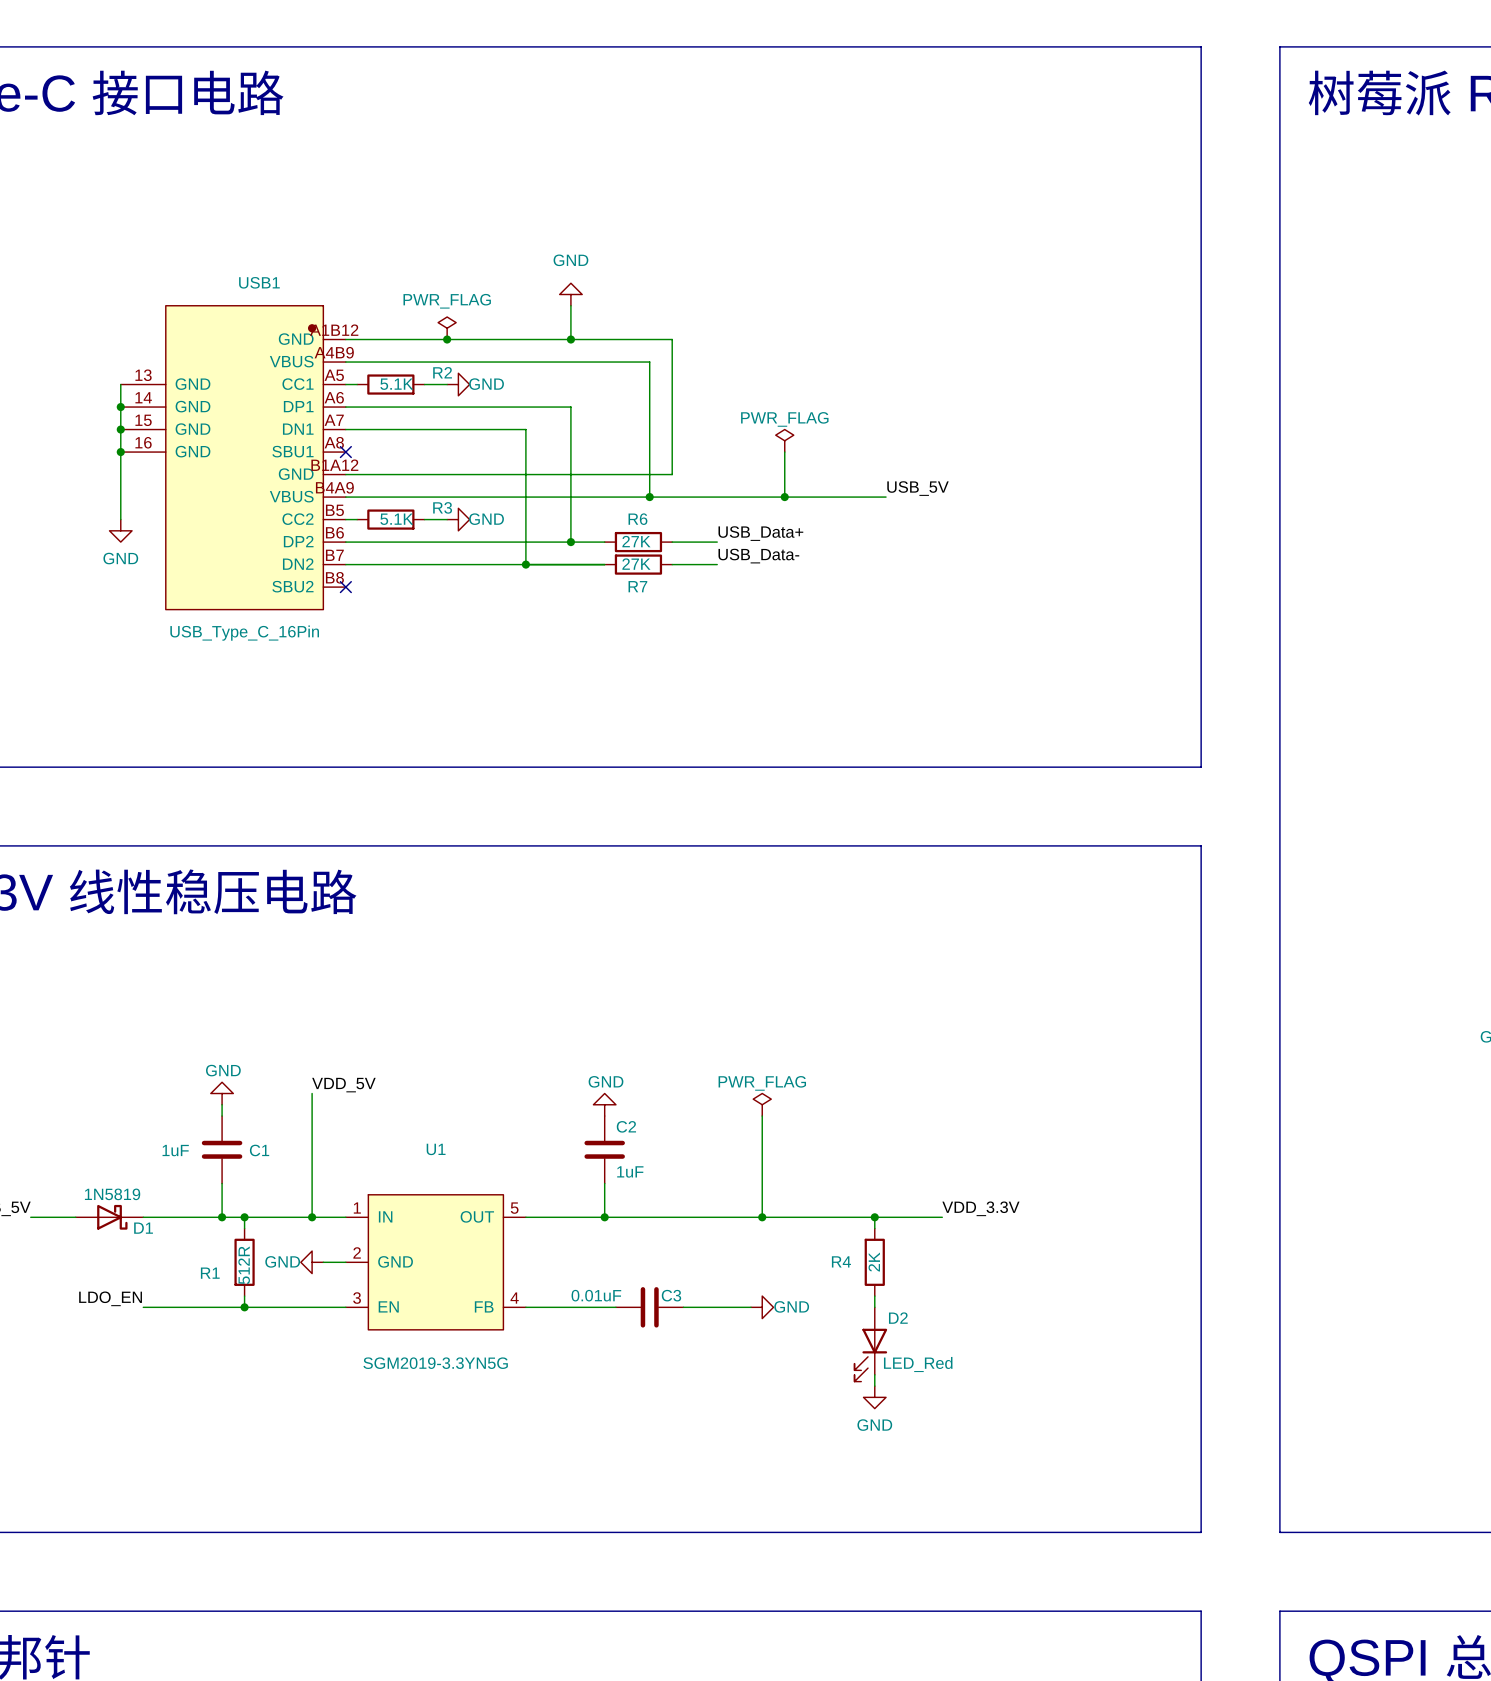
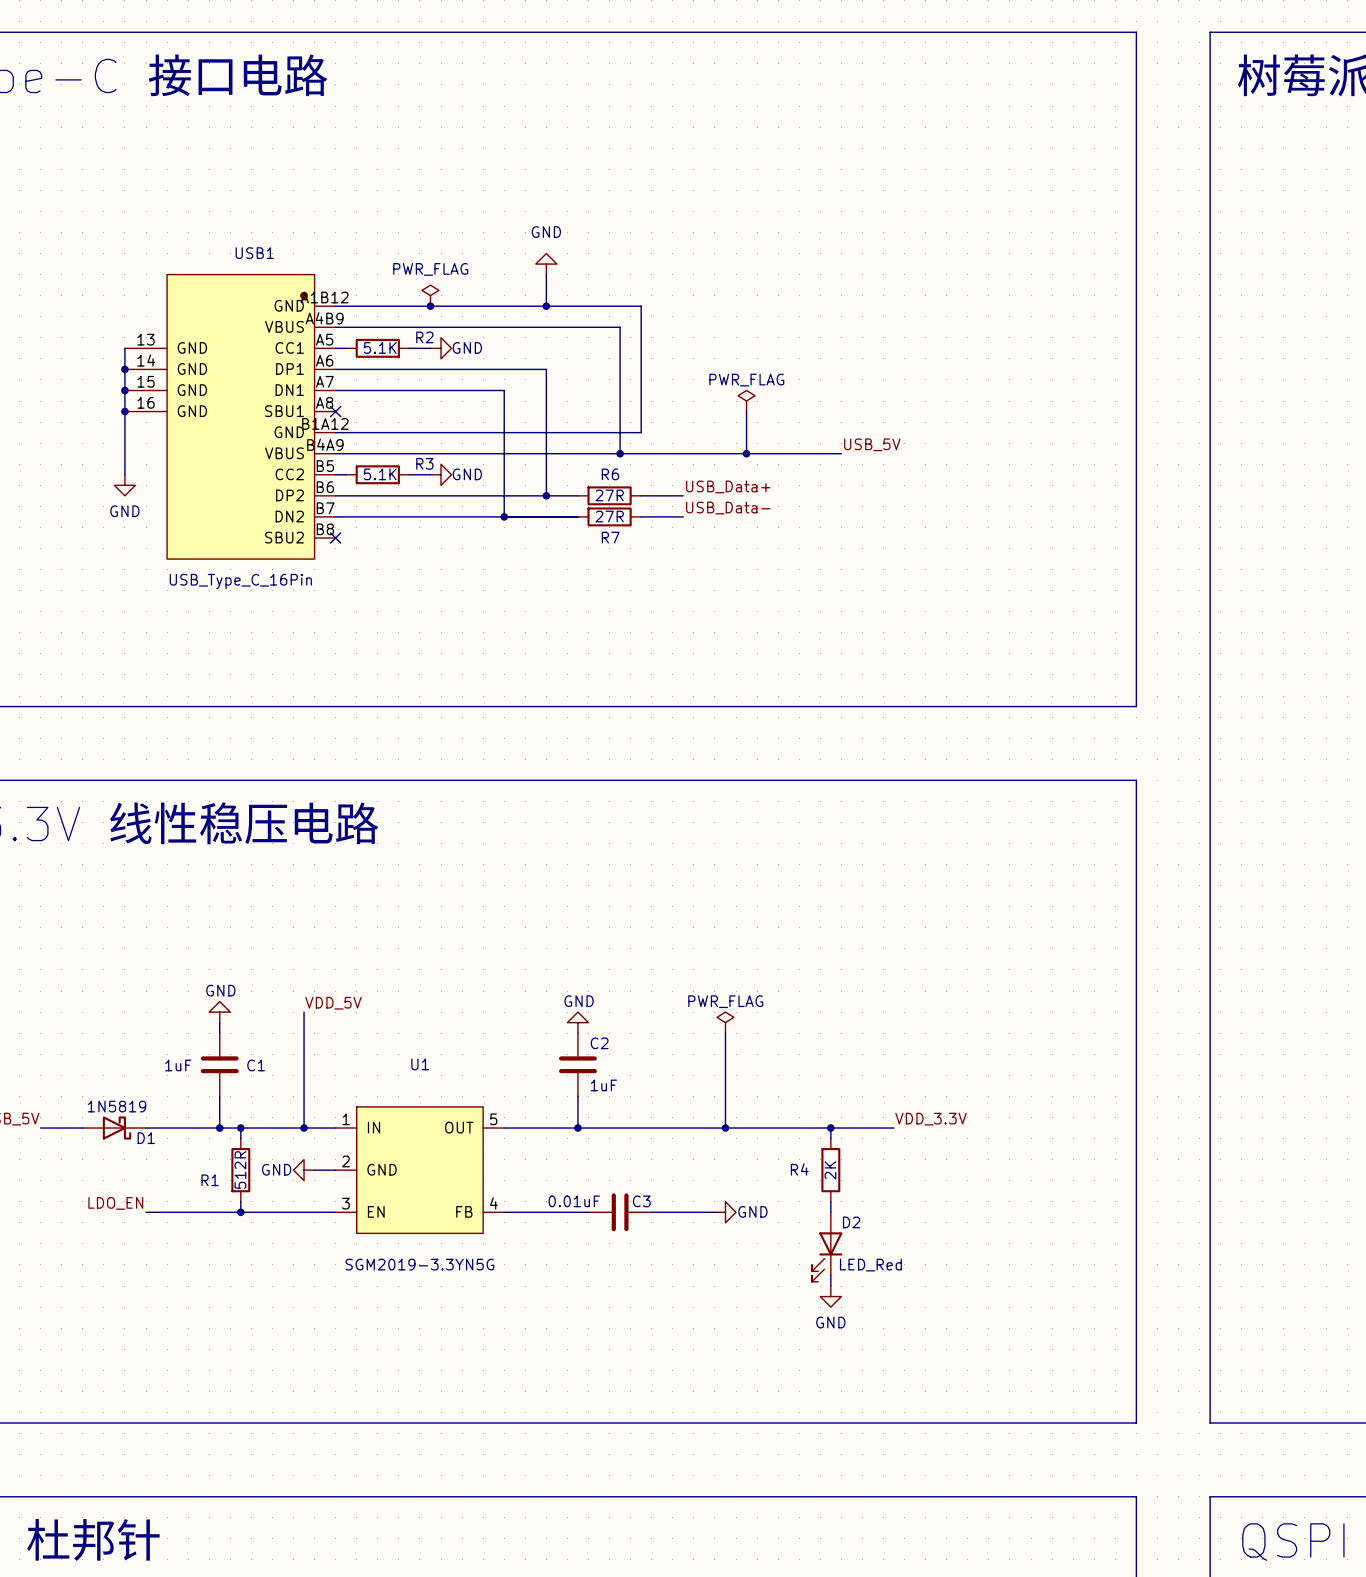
R6 value: 27K (636, 541) -> 27R (609, 495)
R7 value: 27K (636, 564) -> 27R (609, 516)

